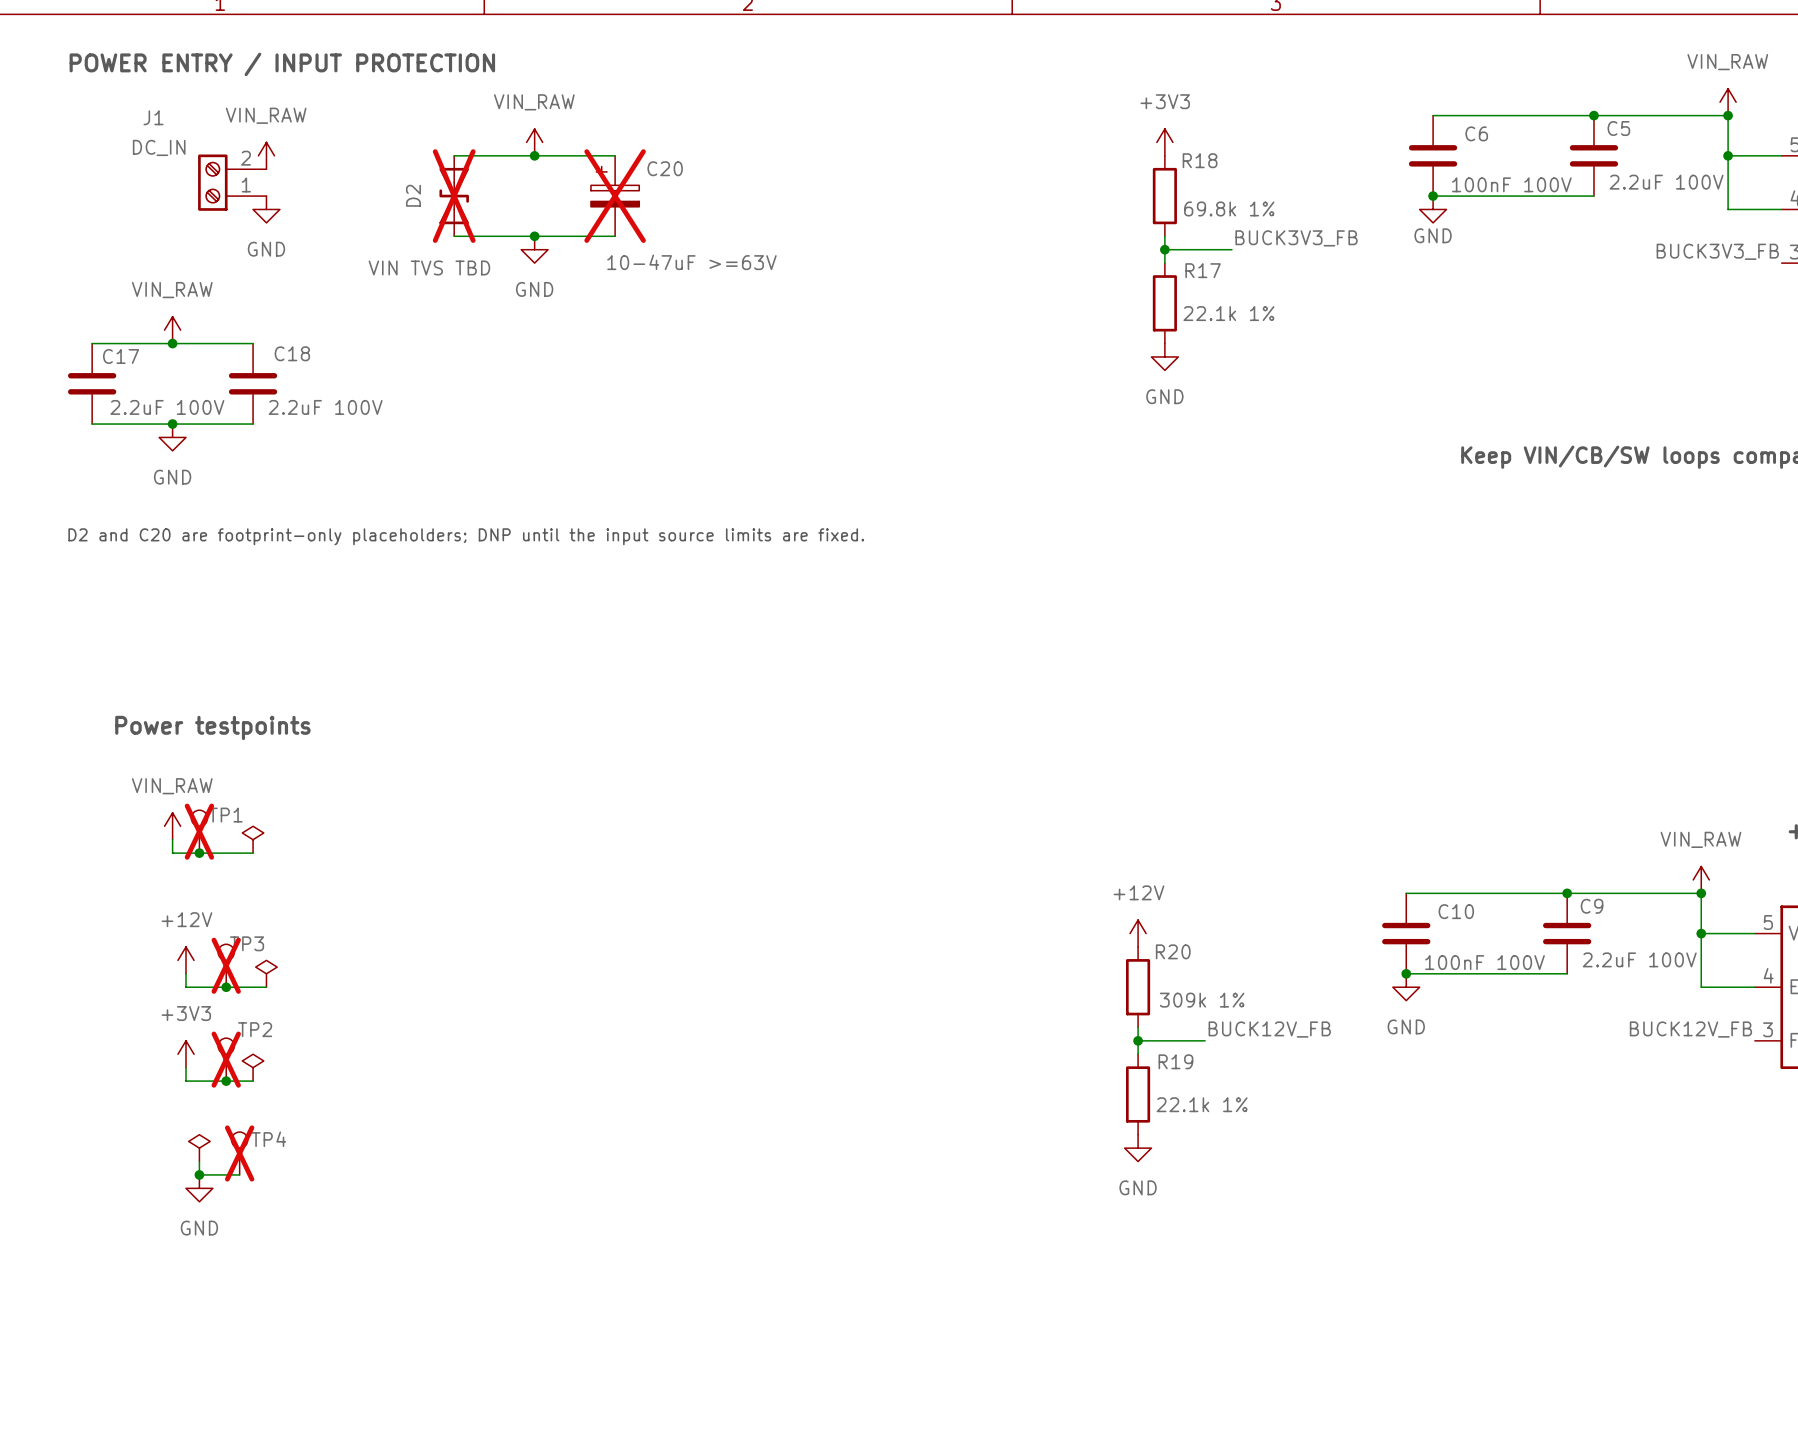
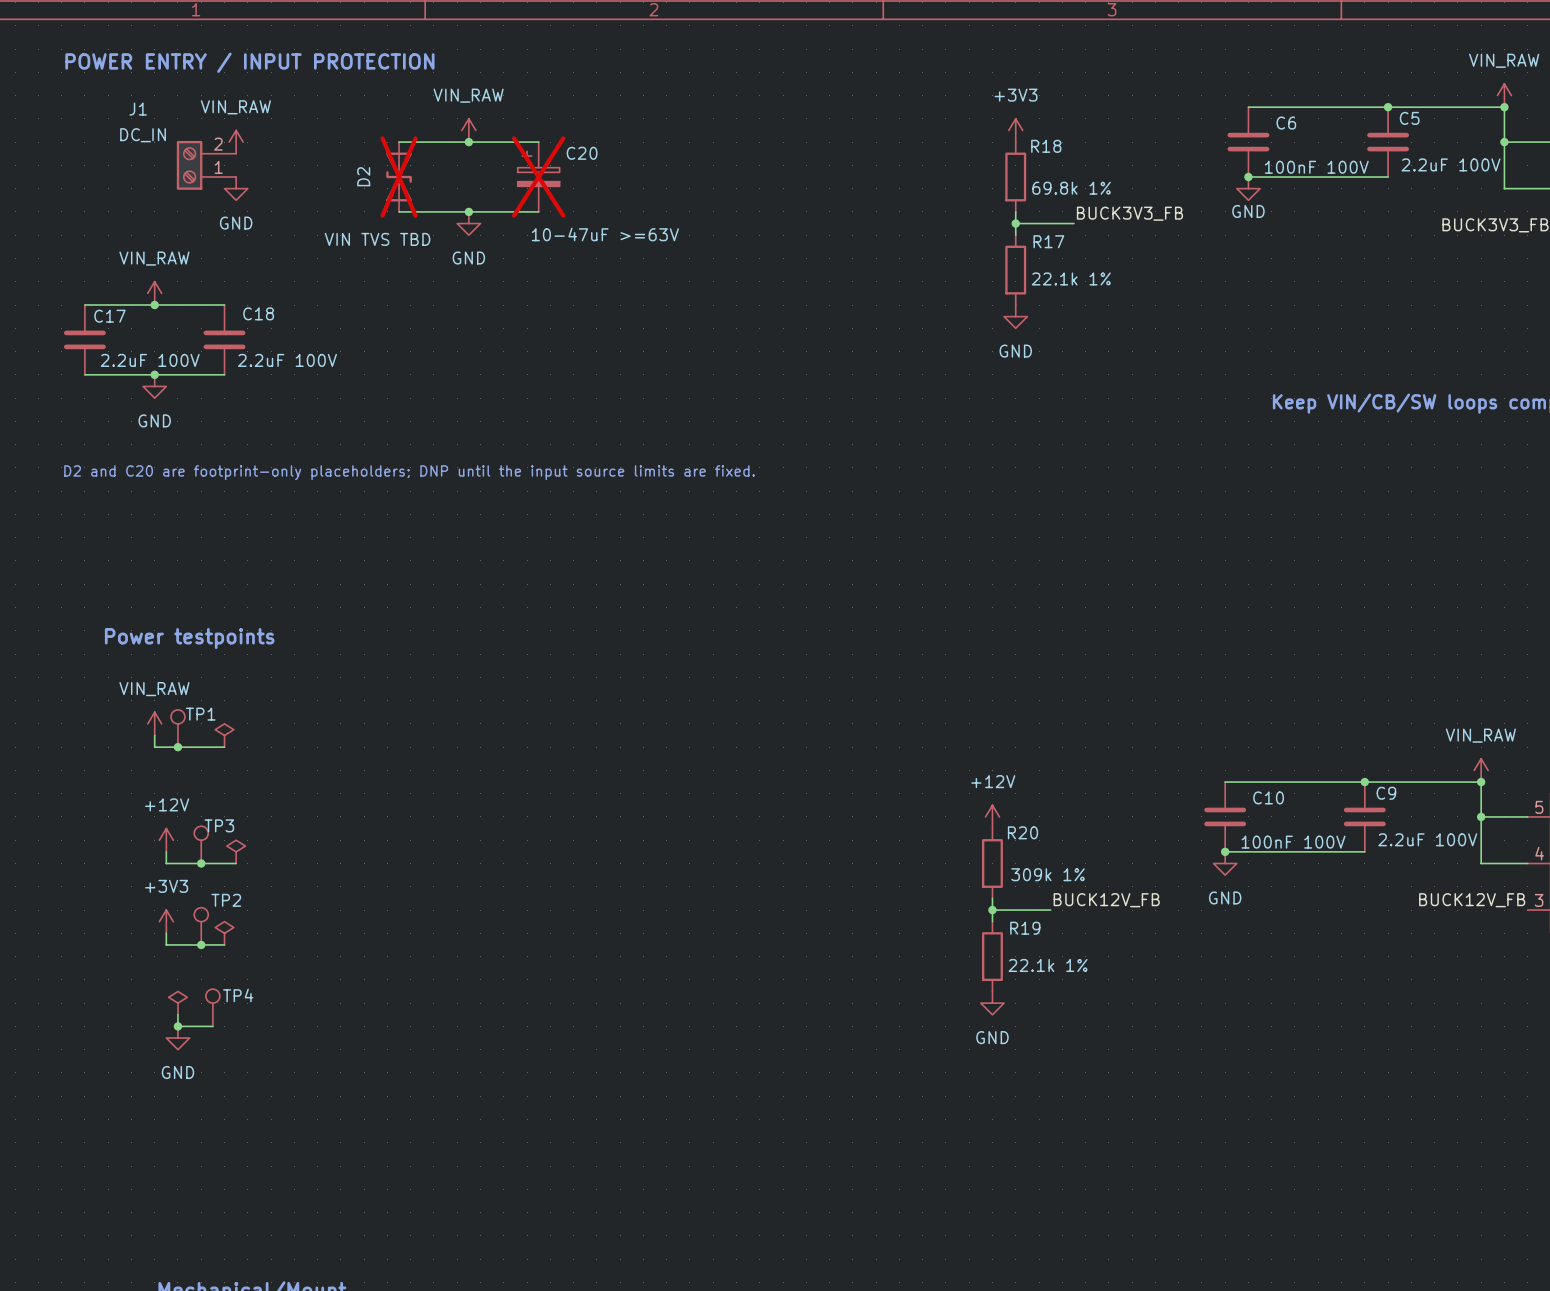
TP1 do-not-place cross: (199, 831) -> none
TP3 do-not-place cross: (226, 965) -> none
TP2 do-not-place cross: (226, 1059) -> none
TP4 do-not-place cross: (239, 1153) -> none

